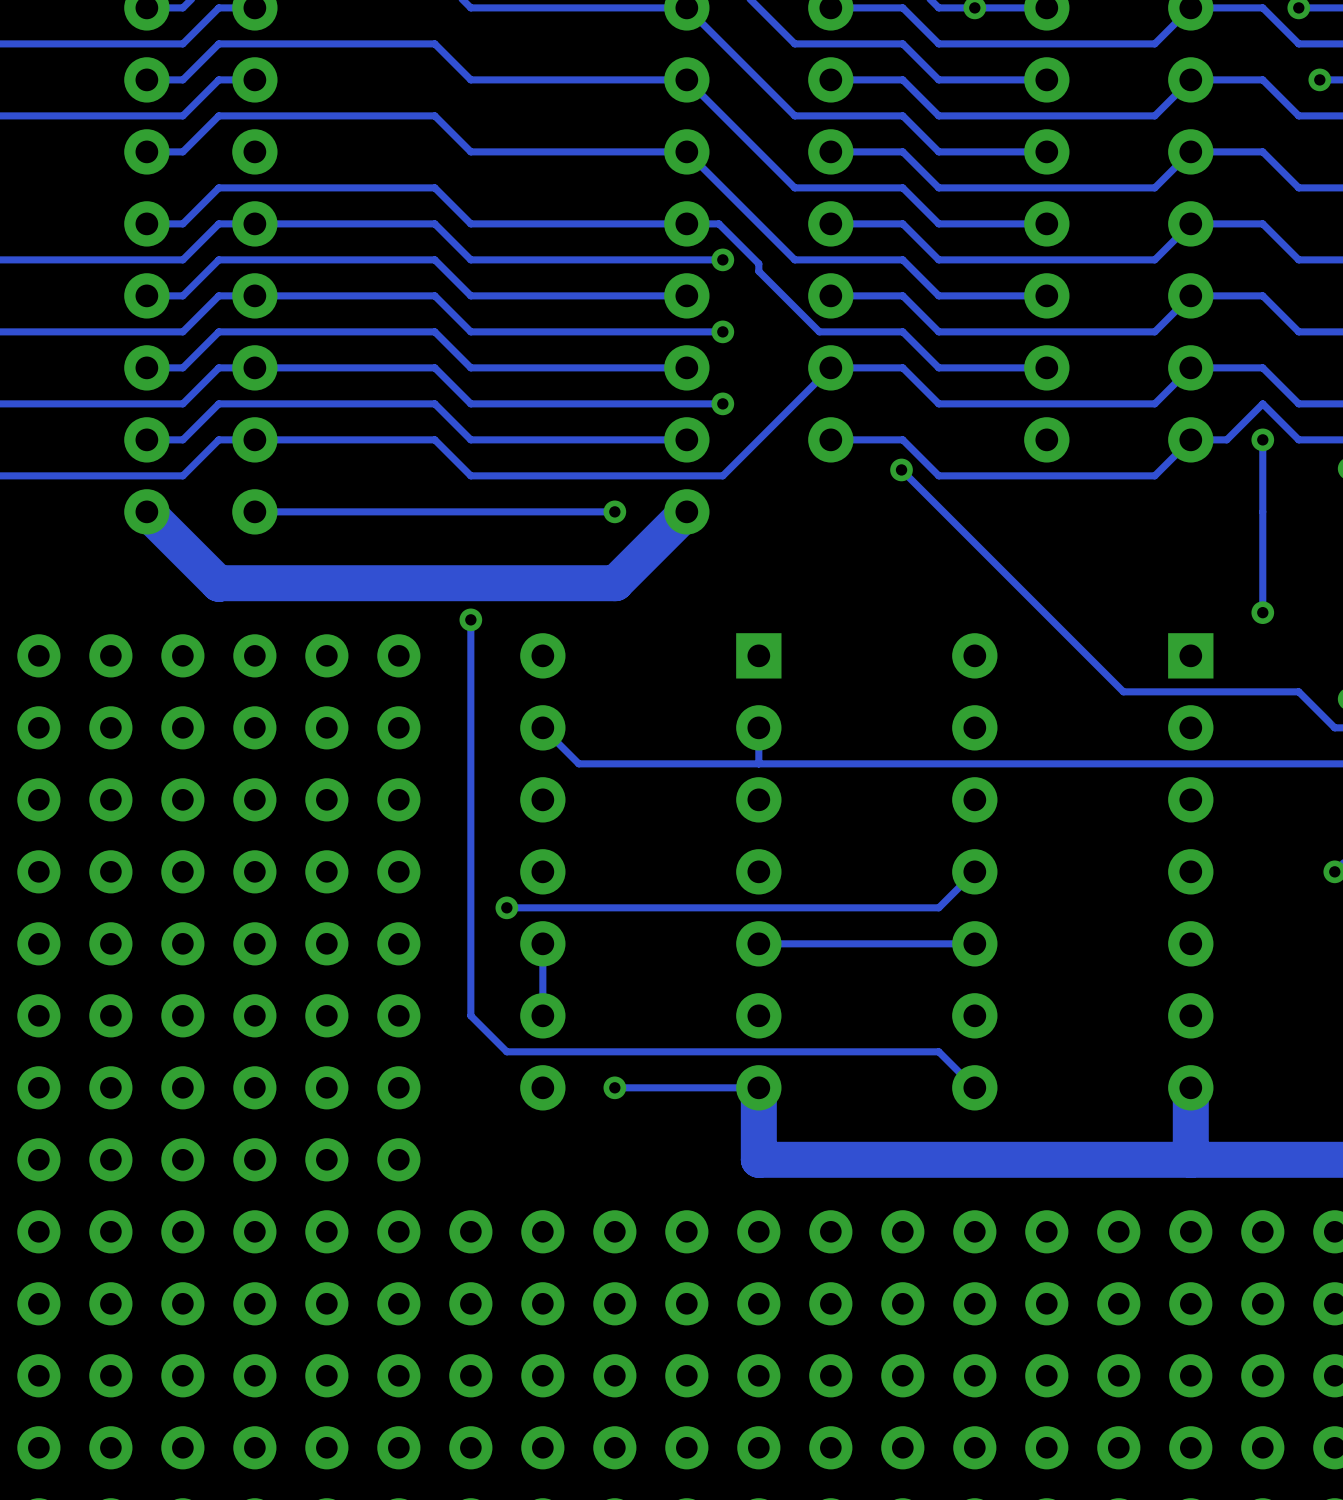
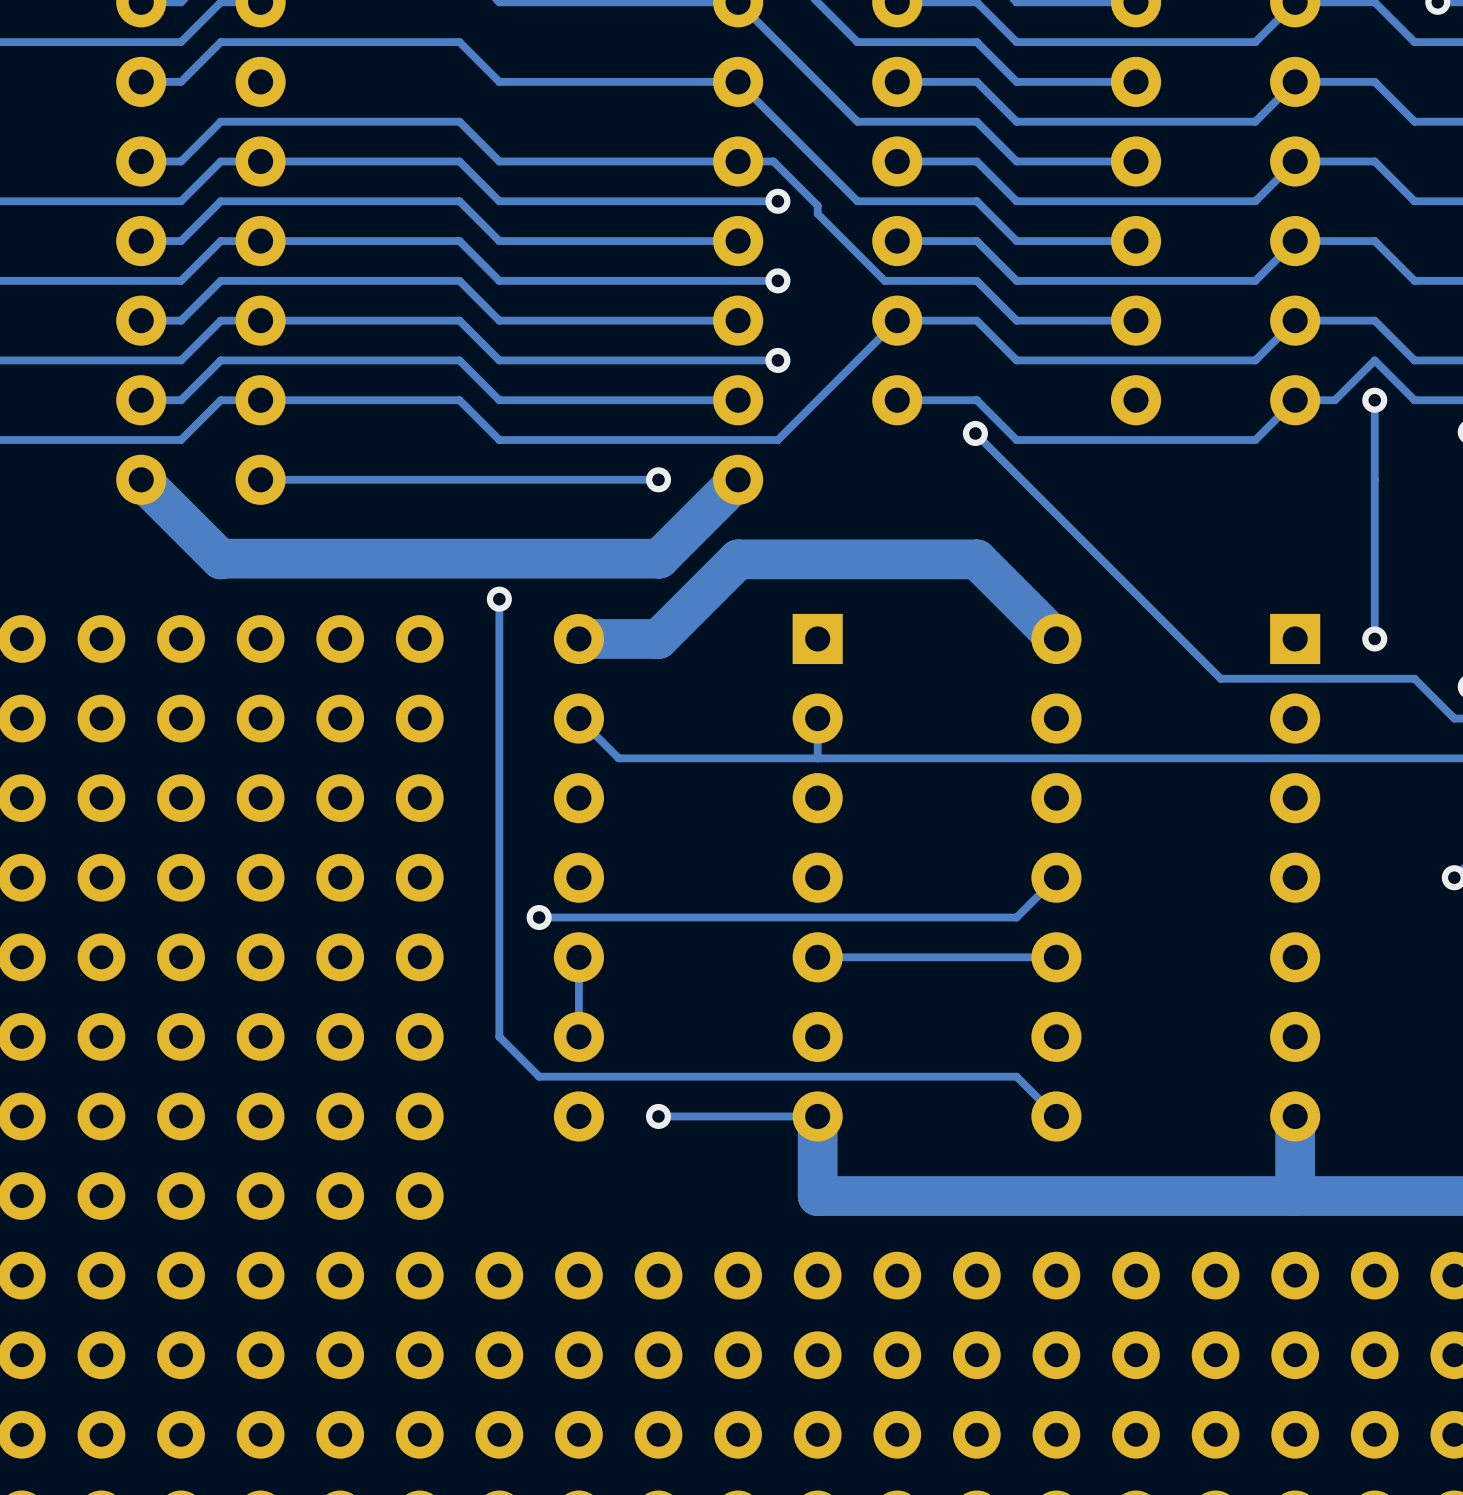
track: none -> (1374, 591) (1374, 638)
via position: (1262, 612) -> (1374, 638)
track: none -> (1056, 638) (976, 559) (738, 559) (658, 638) (578, 638)

